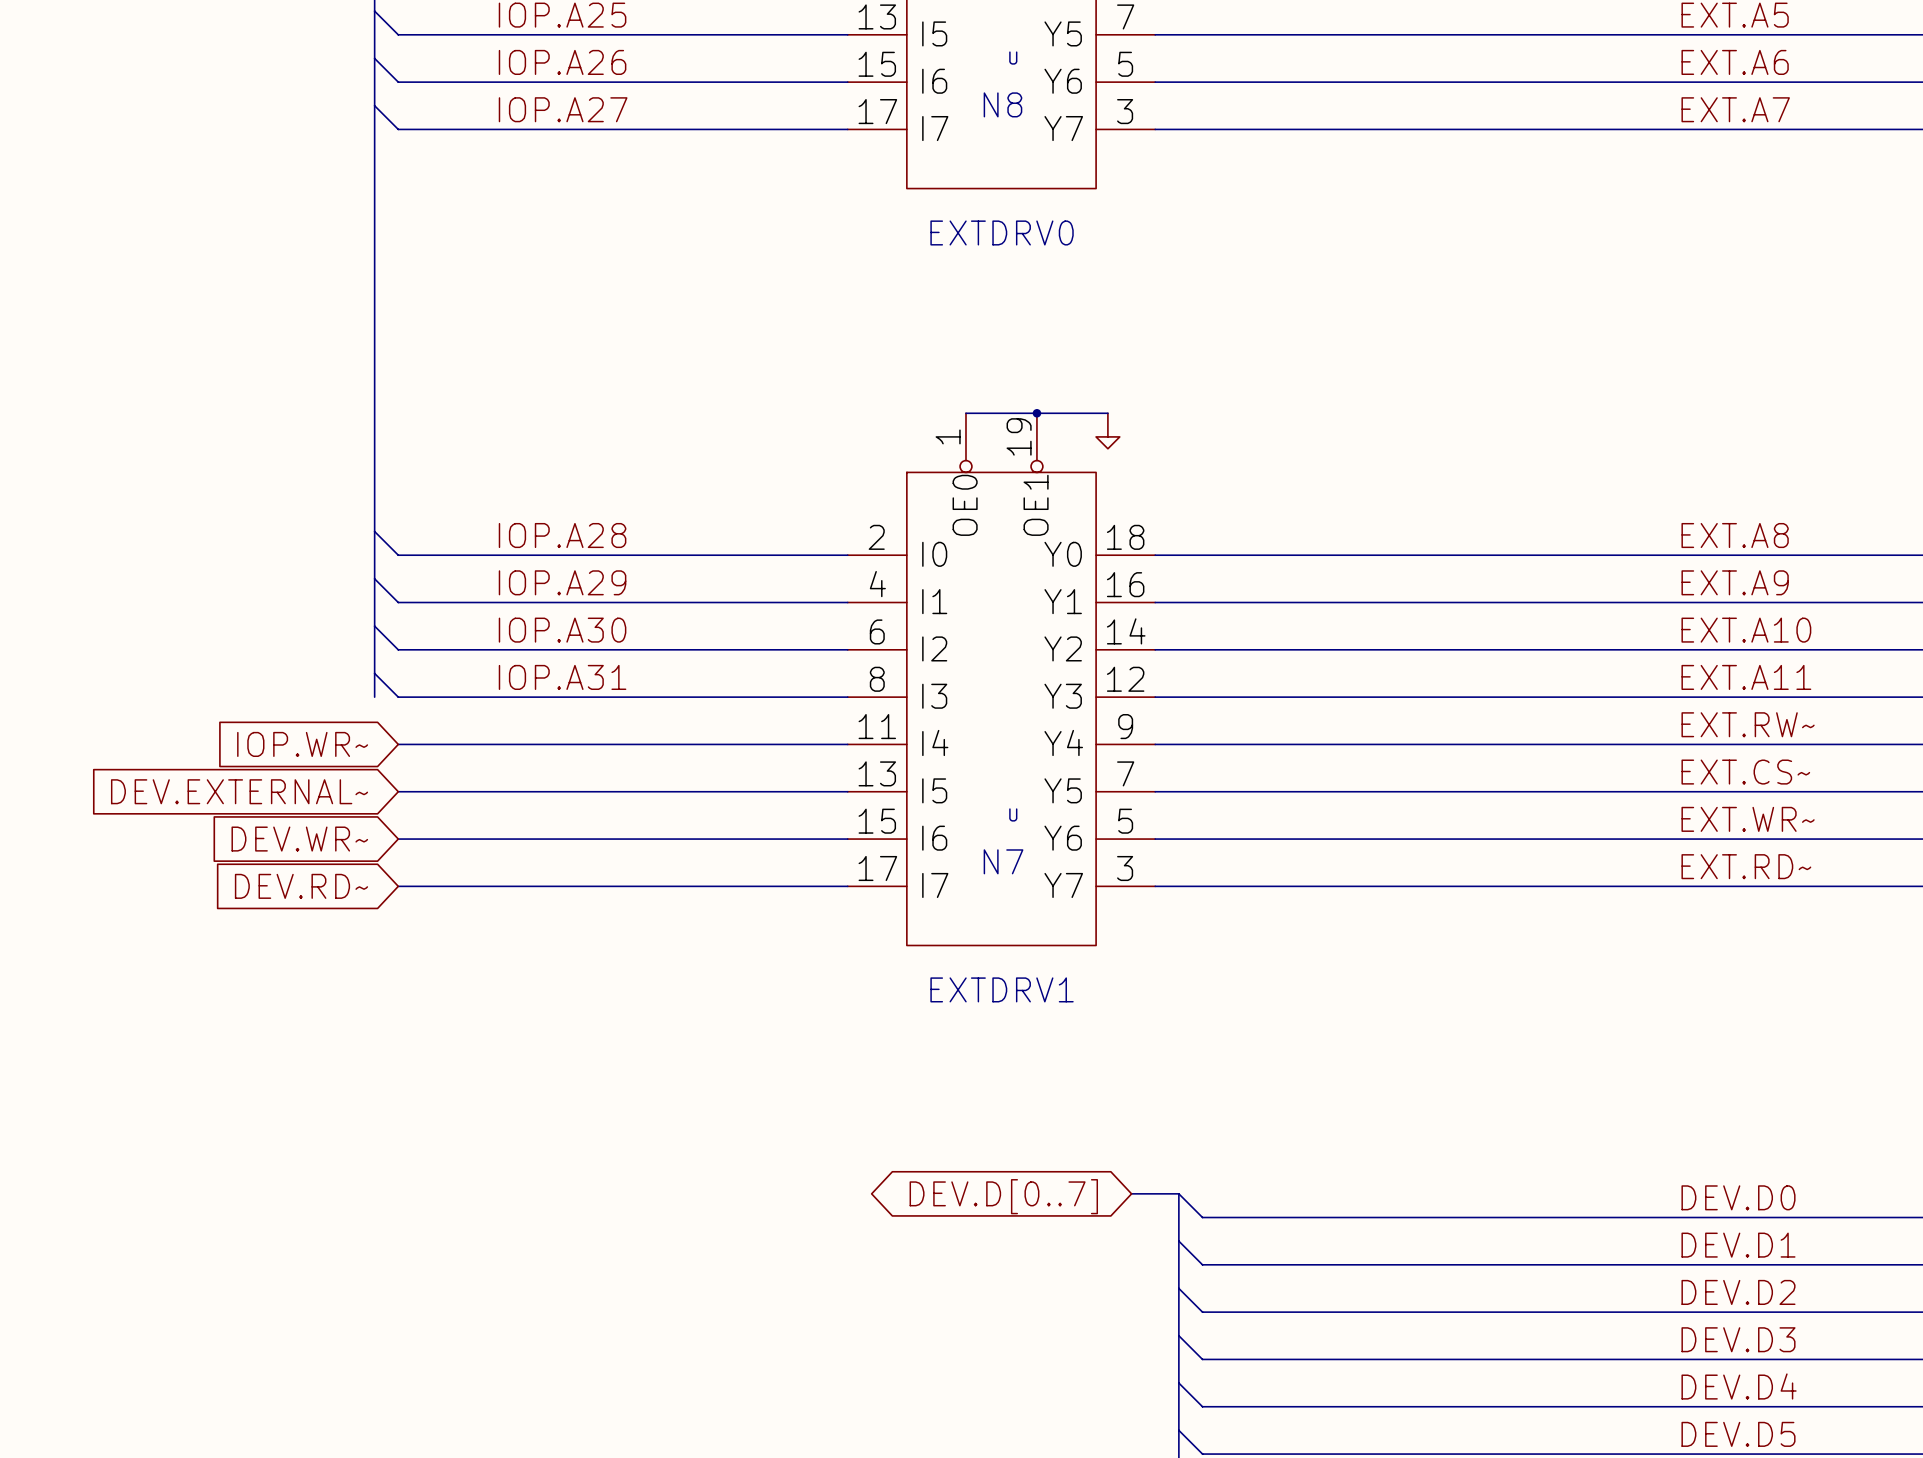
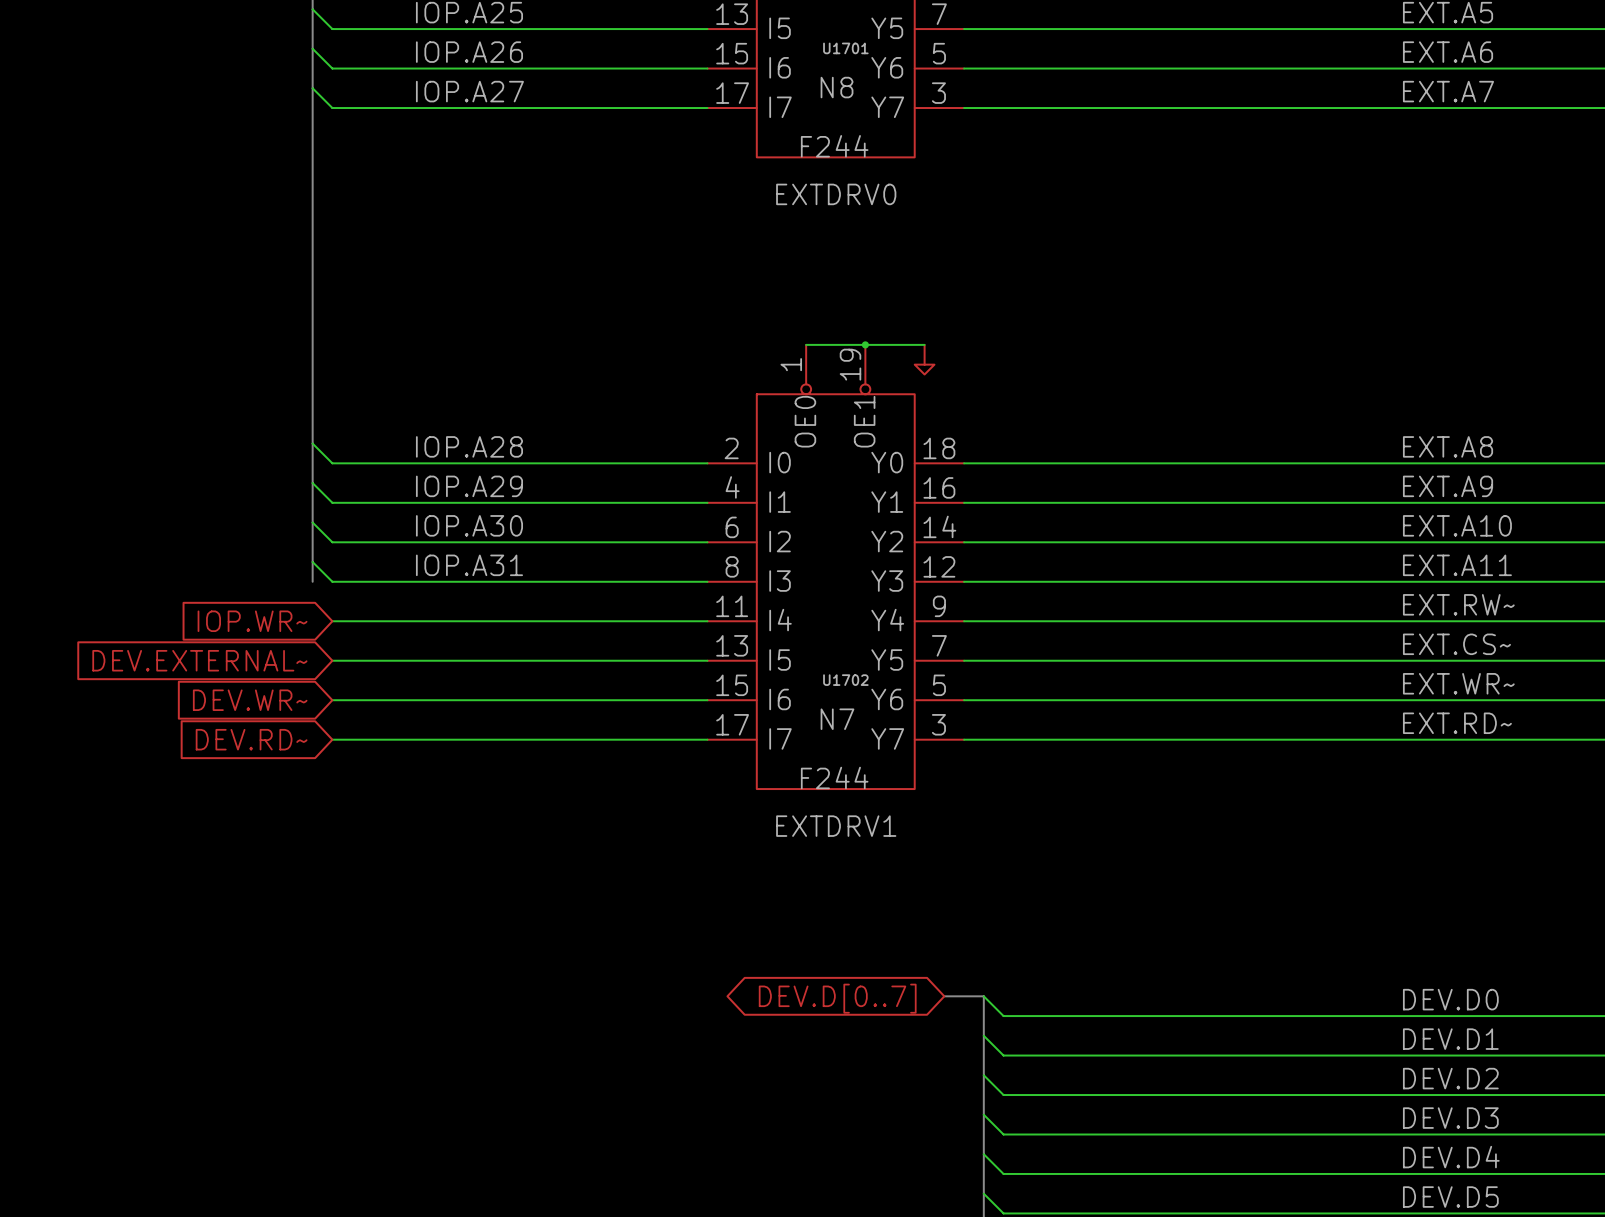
U name: U (1013, 58) -> U1701 (845, 48)
U value: none -> F244 (834, 146)
U name: U (1013, 814) -> U1702 (845, 680)
U value: none -> F244 (834, 777)

